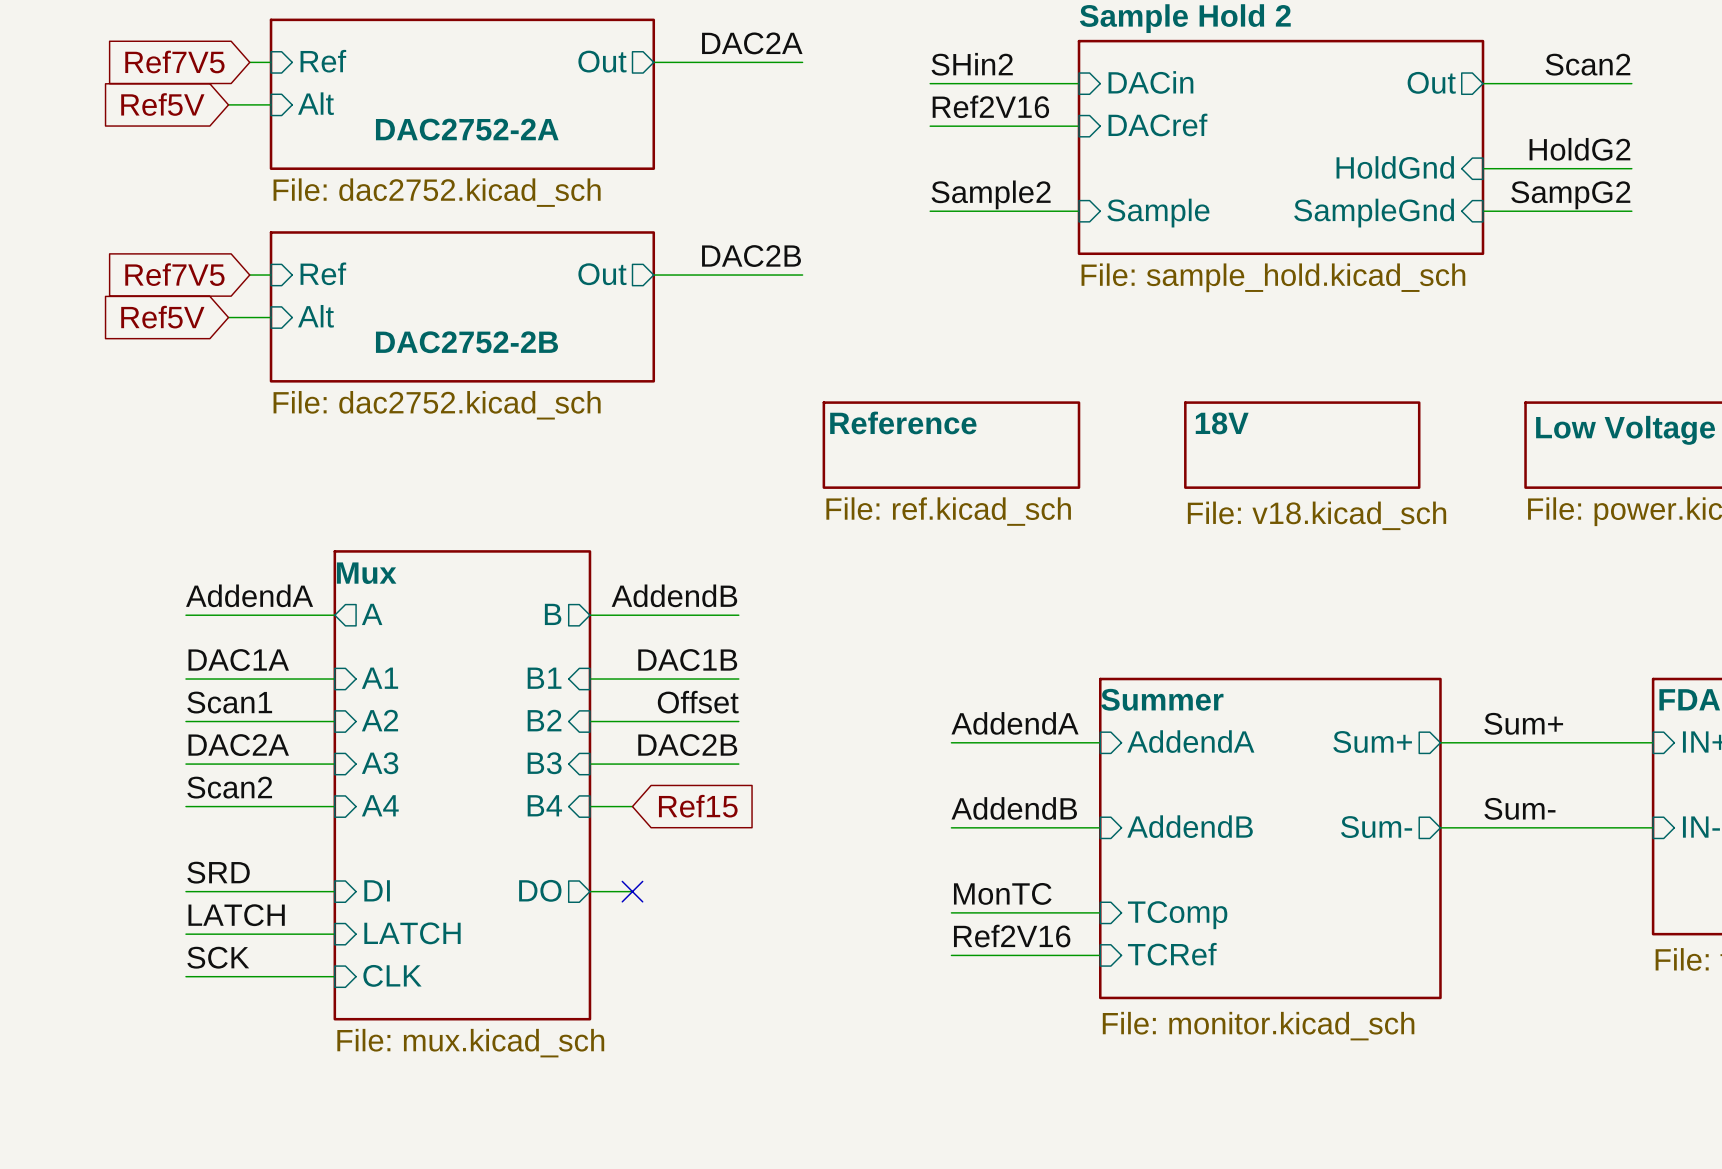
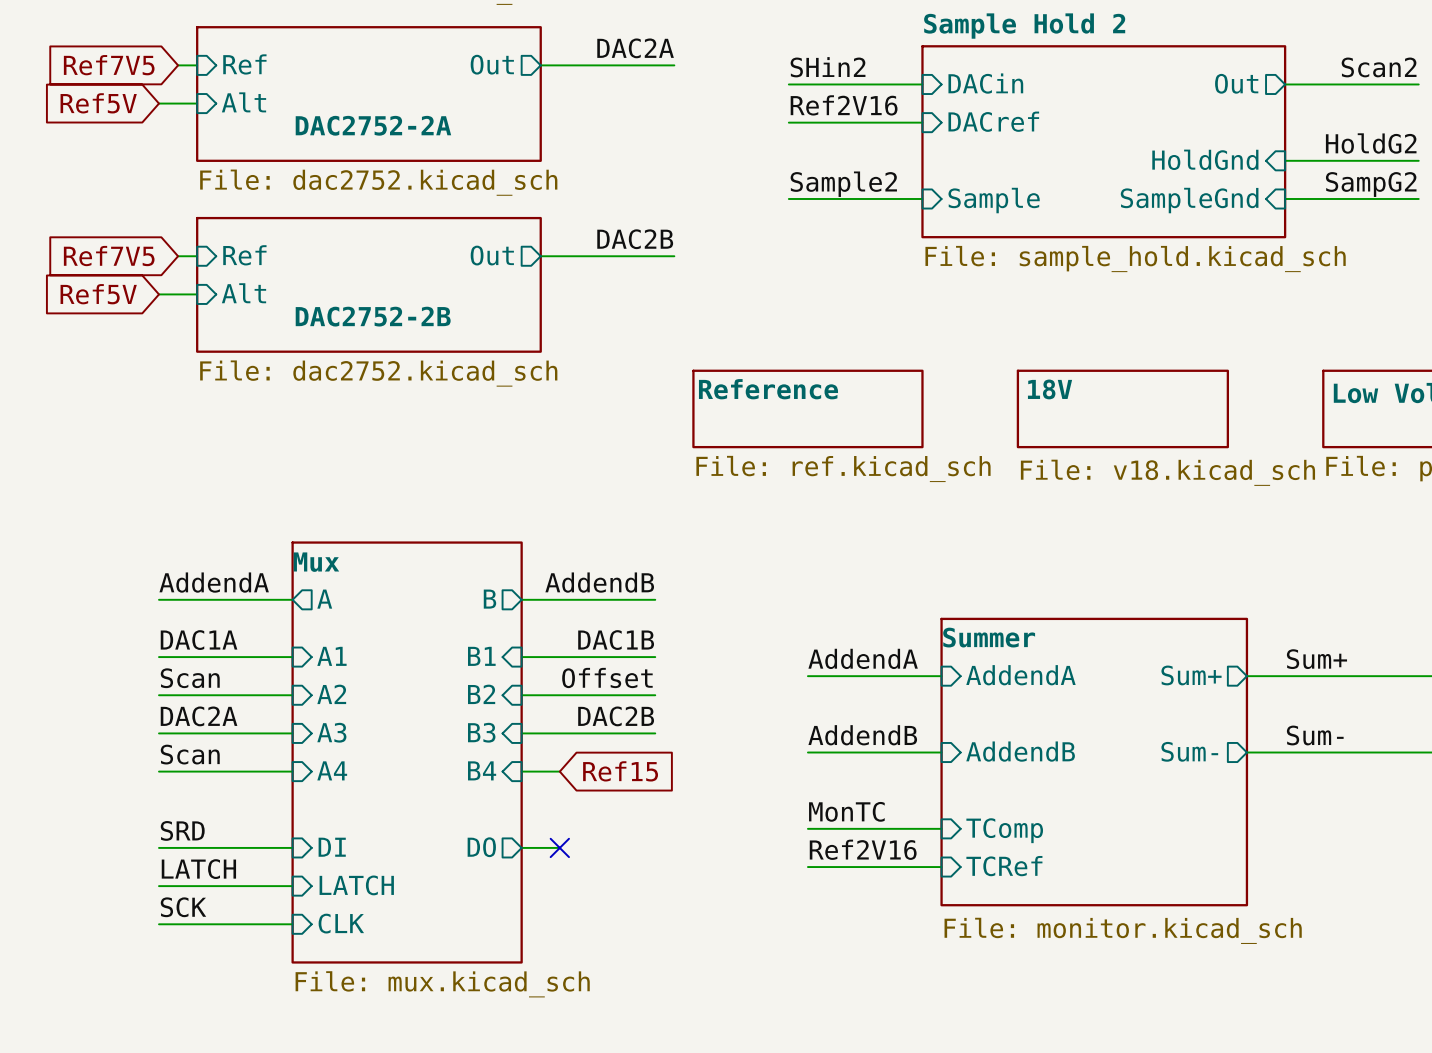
label position: AddendA (249, 595) -> AddendA (214, 582)
label position: AddendB (674, 595) -> AddendB (599, 582)
sheet pin position: A (372, 614) -> A (324, 599)
sheet pin position: B (553, 614) -> B (489, 599)
wire: (185, 615) (334, 615) -> (159, 599) (292, 599)
wire: (589, 615) (738, 615) -> (521, 599) (655, 599)
label position: DAC1A (238, 660) -> DAC1A (199, 640)
label position: DAC1B (687, 660) -> DAC1B (616, 640)
sheet pin position: A1 (379, 678) -> A1 (331, 656)
sheet pin position: B1 (544, 678) -> B1 (481, 656)
wire: (185, 679) (334, 679) -> (159, 771) (292, 771)
wire: (589, 679) (738, 679) -> none
label: Scan1 (229, 702) -> none
label position: Offset (698, 702) -> Offset (607, 678)
sheet pin position: A2 (379, 720) -> A2 (331, 694)
sheet pin position: B2 (544, 720) -> B2 (481, 694)
wire: (185, 721) (228, 721) -> (254, 657) (292, 657)
wire: (589, 721) (632, 721) -> (617, 657) (655, 657)
label position: DAC2A (238, 745) -> DAC2A (199, 716)
label: none -> Scan (190, 678)
label position: DAC2B (687, 745) -> DAC2B (616, 716)
sheet pin position: A3 (380, 763) -> A3 (331, 732)
sheet pin position: B3 (544, 763) -> B3 (481, 732)
wire: (185, 764) (228, 764) -> (254, 695) (292, 695)
wire: (589, 764) (632, 764) -> (617, 695) (655, 695)
sheet Mux position: (462, 785) -> (407, 752)
label: Scan2 (229, 787) -> none
sheet pin position: A4 (380, 805) -> A4 (332, 770)
sheet pin position: B4 (544, 805) -> B4 (482, 770)
wire: (185, 806) (228, 806) -> (254, 733) (292, 733)
wire: (589, 806) (632, 806) -> (655, 733) (521, 733)
global label position: Ref15 (698, 806) -> Ref15 (620, 771)
label: none -> Scan (190, 754)
wire: none -> (521, 771) (559, 771)
label position: SRD (218, 872) -> SRD (182, 830)
sheet pin position: DI (377, 890) -> DI (332, 847)
sheet pin position: DO (540, 890) -> DO (481, 847)
wire: (185, 891) (334, 891) -> (159, 924) (292, 924)
wire: (589, 891) (632, 891) -> (521, 847) (559, 847)
no-connect mark position: (632, 891) -> (559, 847)
label position: LATCH (236, 915) -> LATCH (198, 869)
sheet pin position: LATCH (412, 933) -> LATCH (356, 885)
wire: (185, 934) (228, 934) -> (254, 847) (292, 847)
label position: SCK (218, 957) -> SCK (183, 907)
sheet pin position: CLK (392, 975) -> CLK (341, 923)
wire: (185, 976) (228, 976) -> (254, 886) (292, 886)

